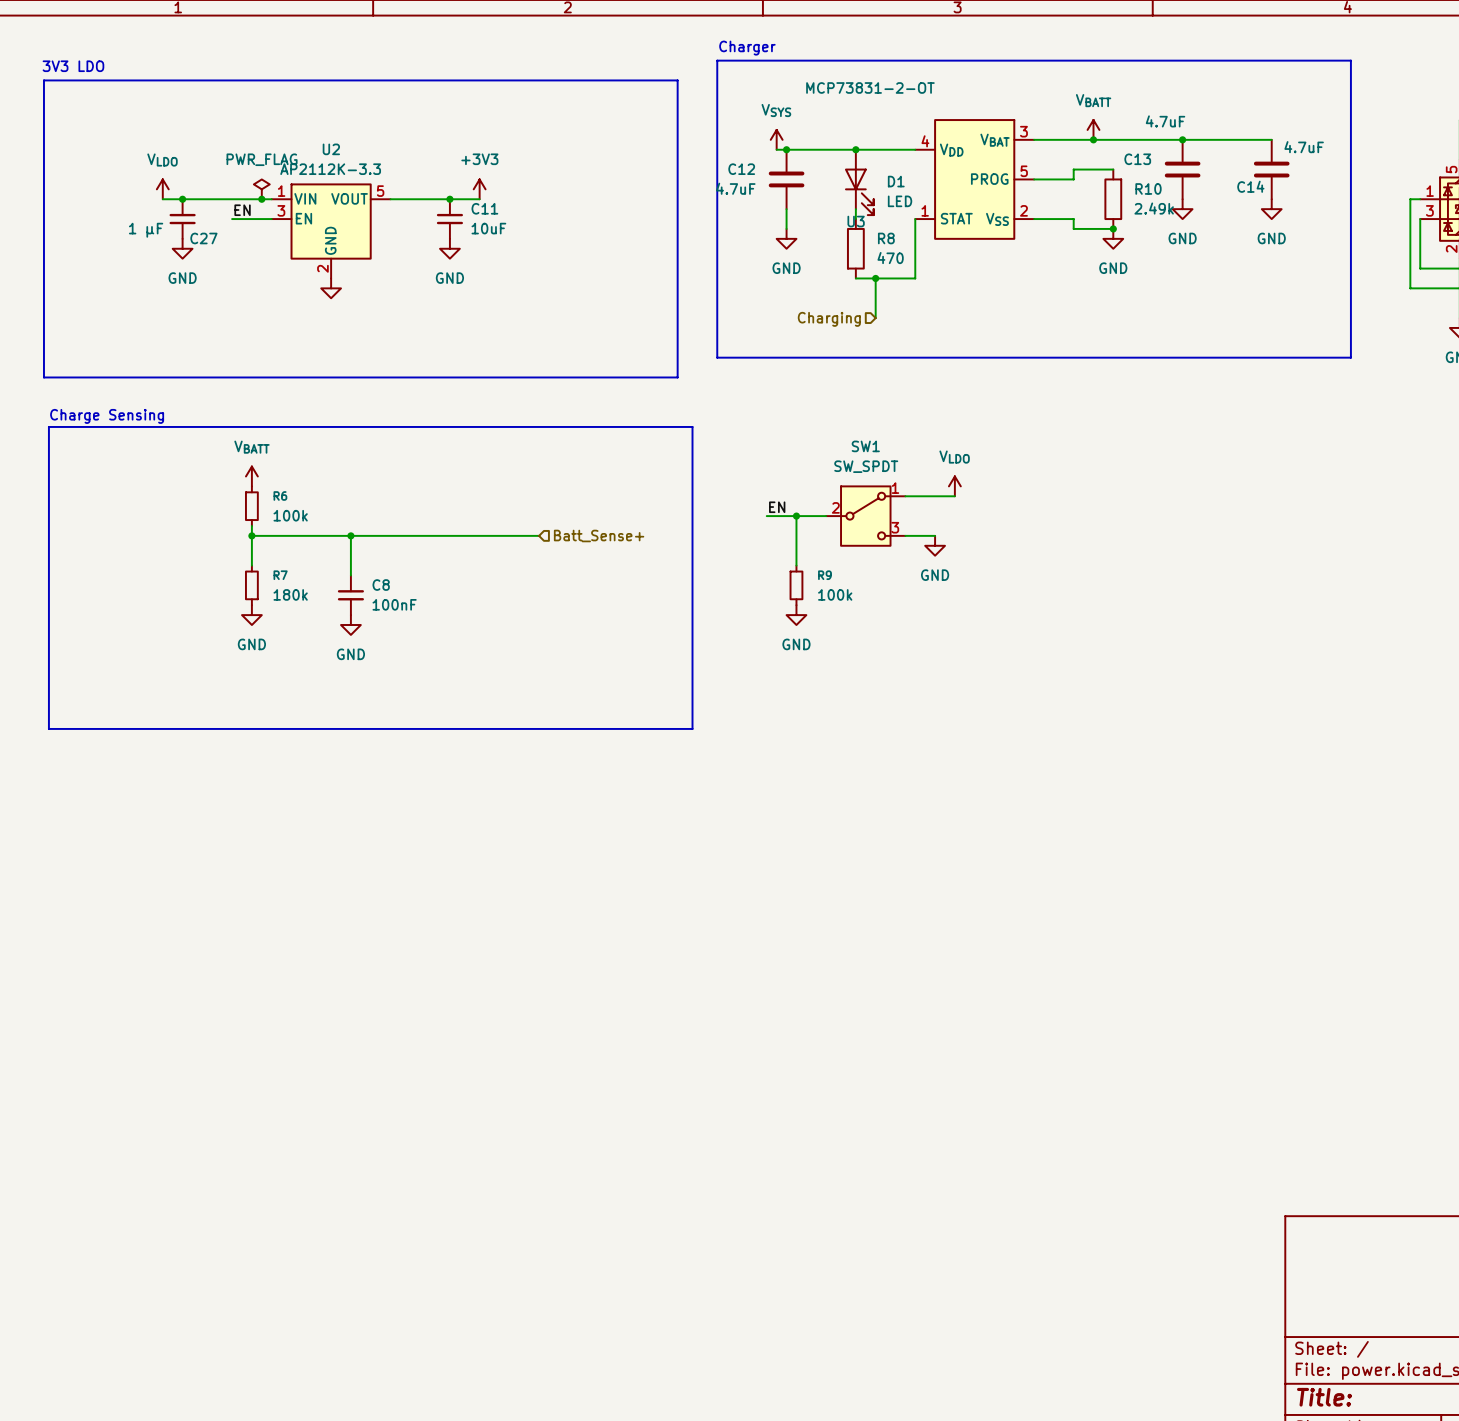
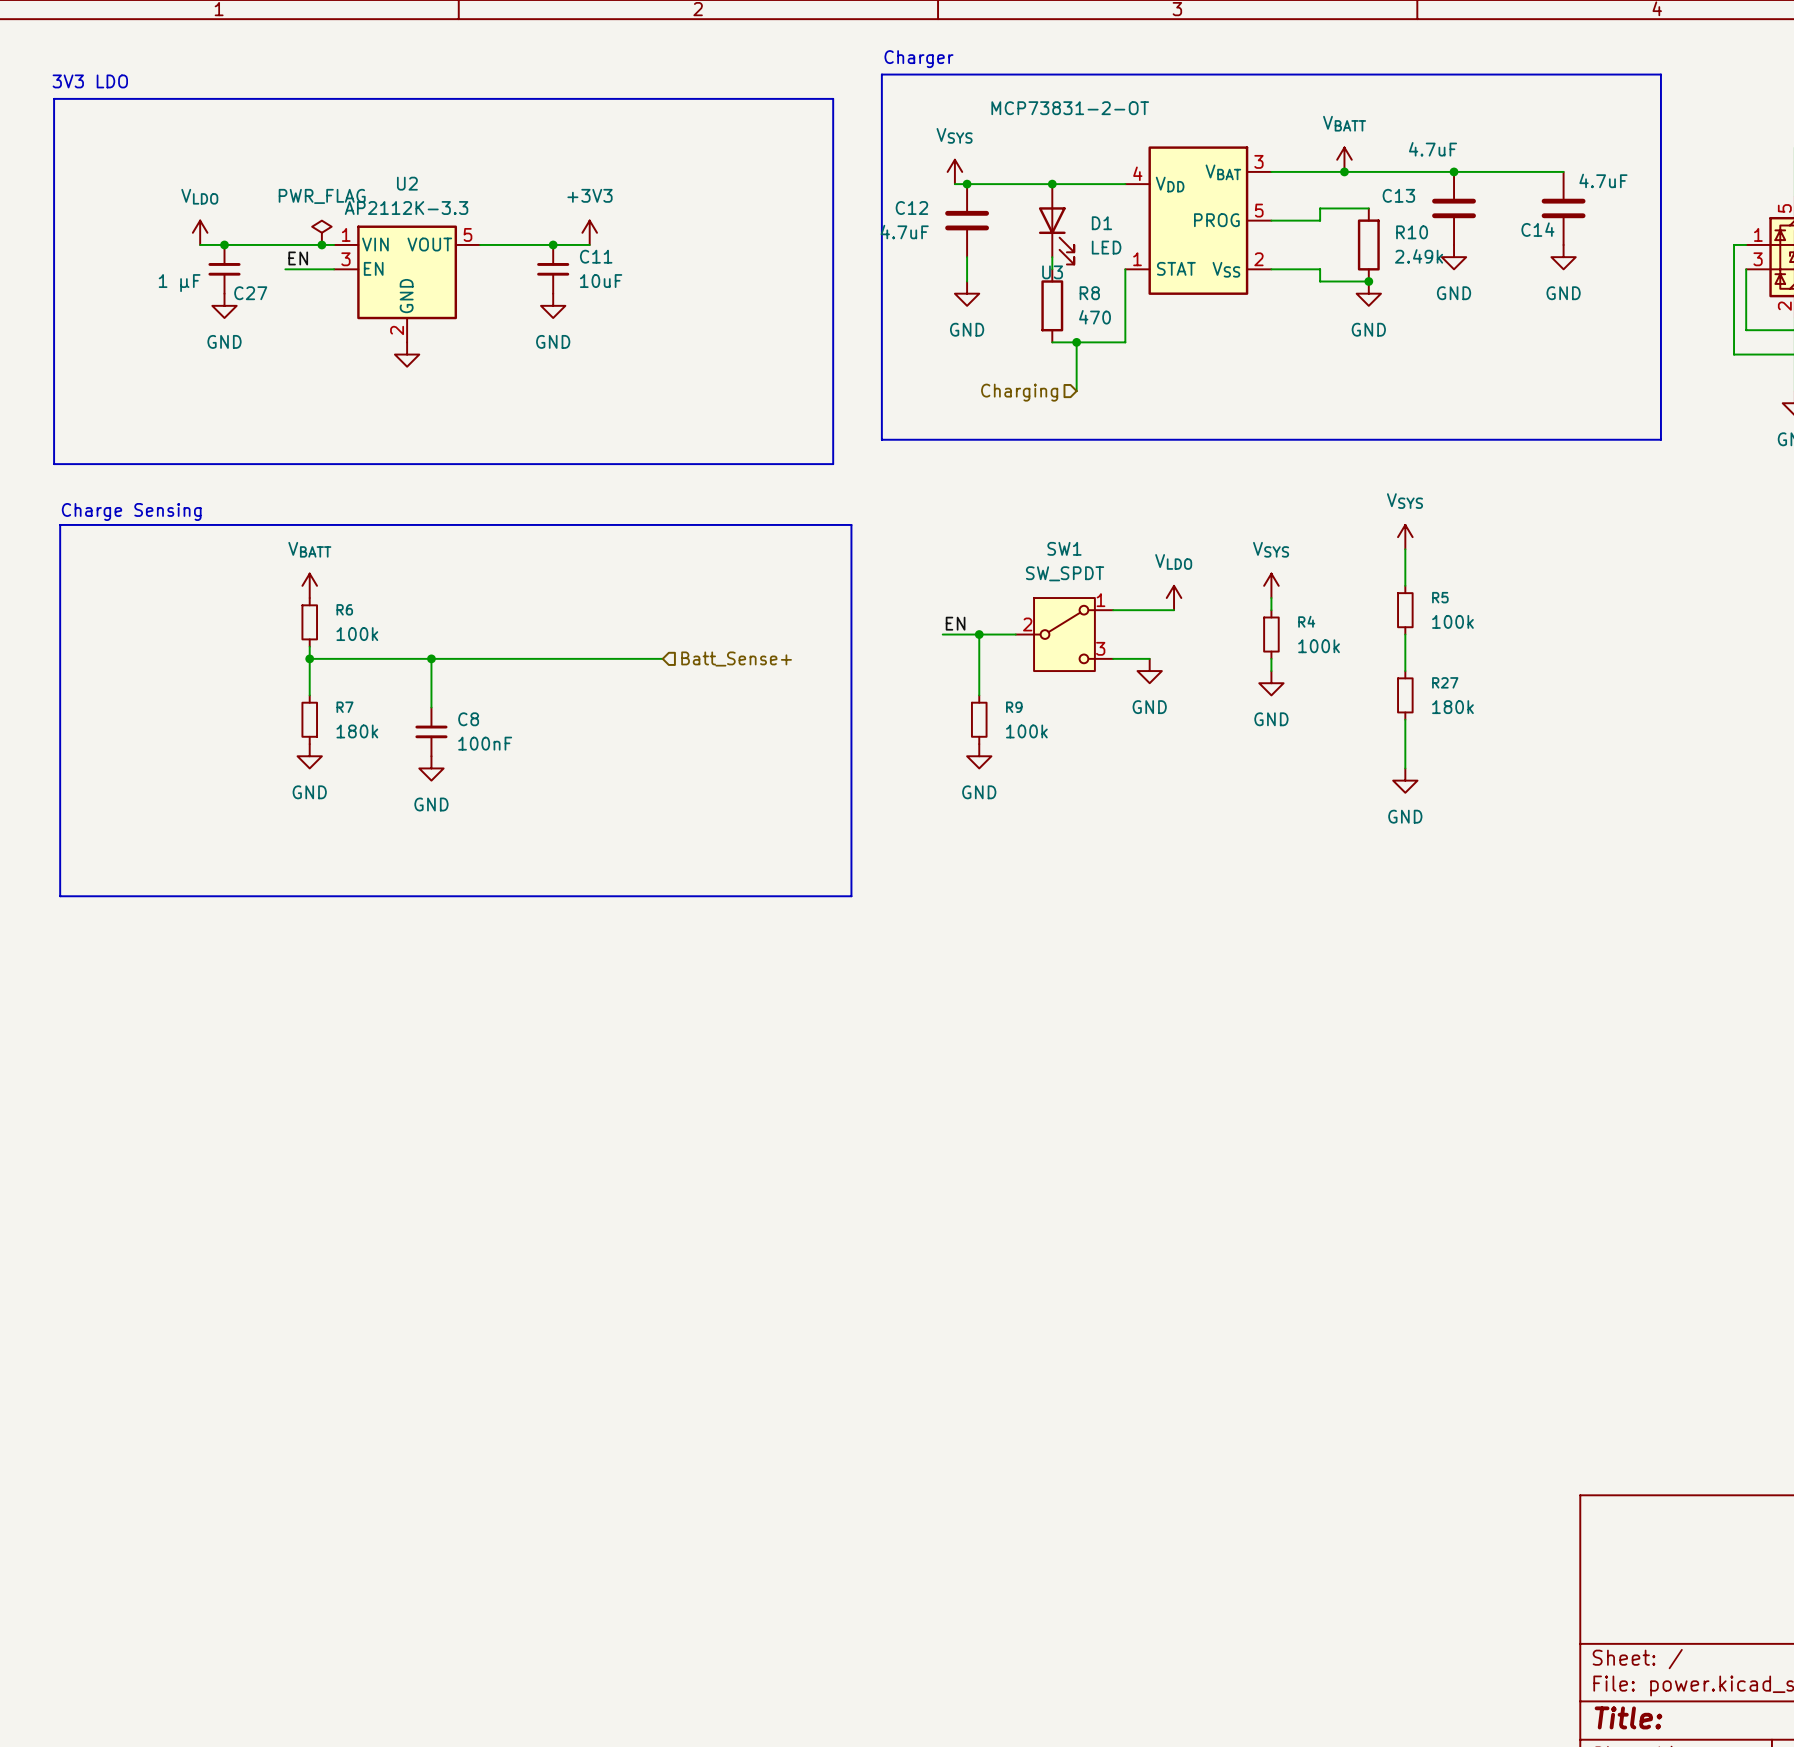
power symbol: none -> VSYS (1405, 537)
wire: none -> (1405, 549) (1405, 585)
power symbol: none -> VSYS (1271, 585)
wire: none -> (1271, 598) (1271, 610)
R5: none -> 100k (1405, 610)
R4: none -> 100k (1271, 634)
wire: none -> (1405, 634) (1405, 671)
wire: none -> (1271, 658) (1271, 671)
power symbol: none -> GND (1271, 683)
R27: none -> 180k (1405, 695)
wire: none -> (1405, 719) (1405, 768)
power symbol: none -> GND (1405, 780)

